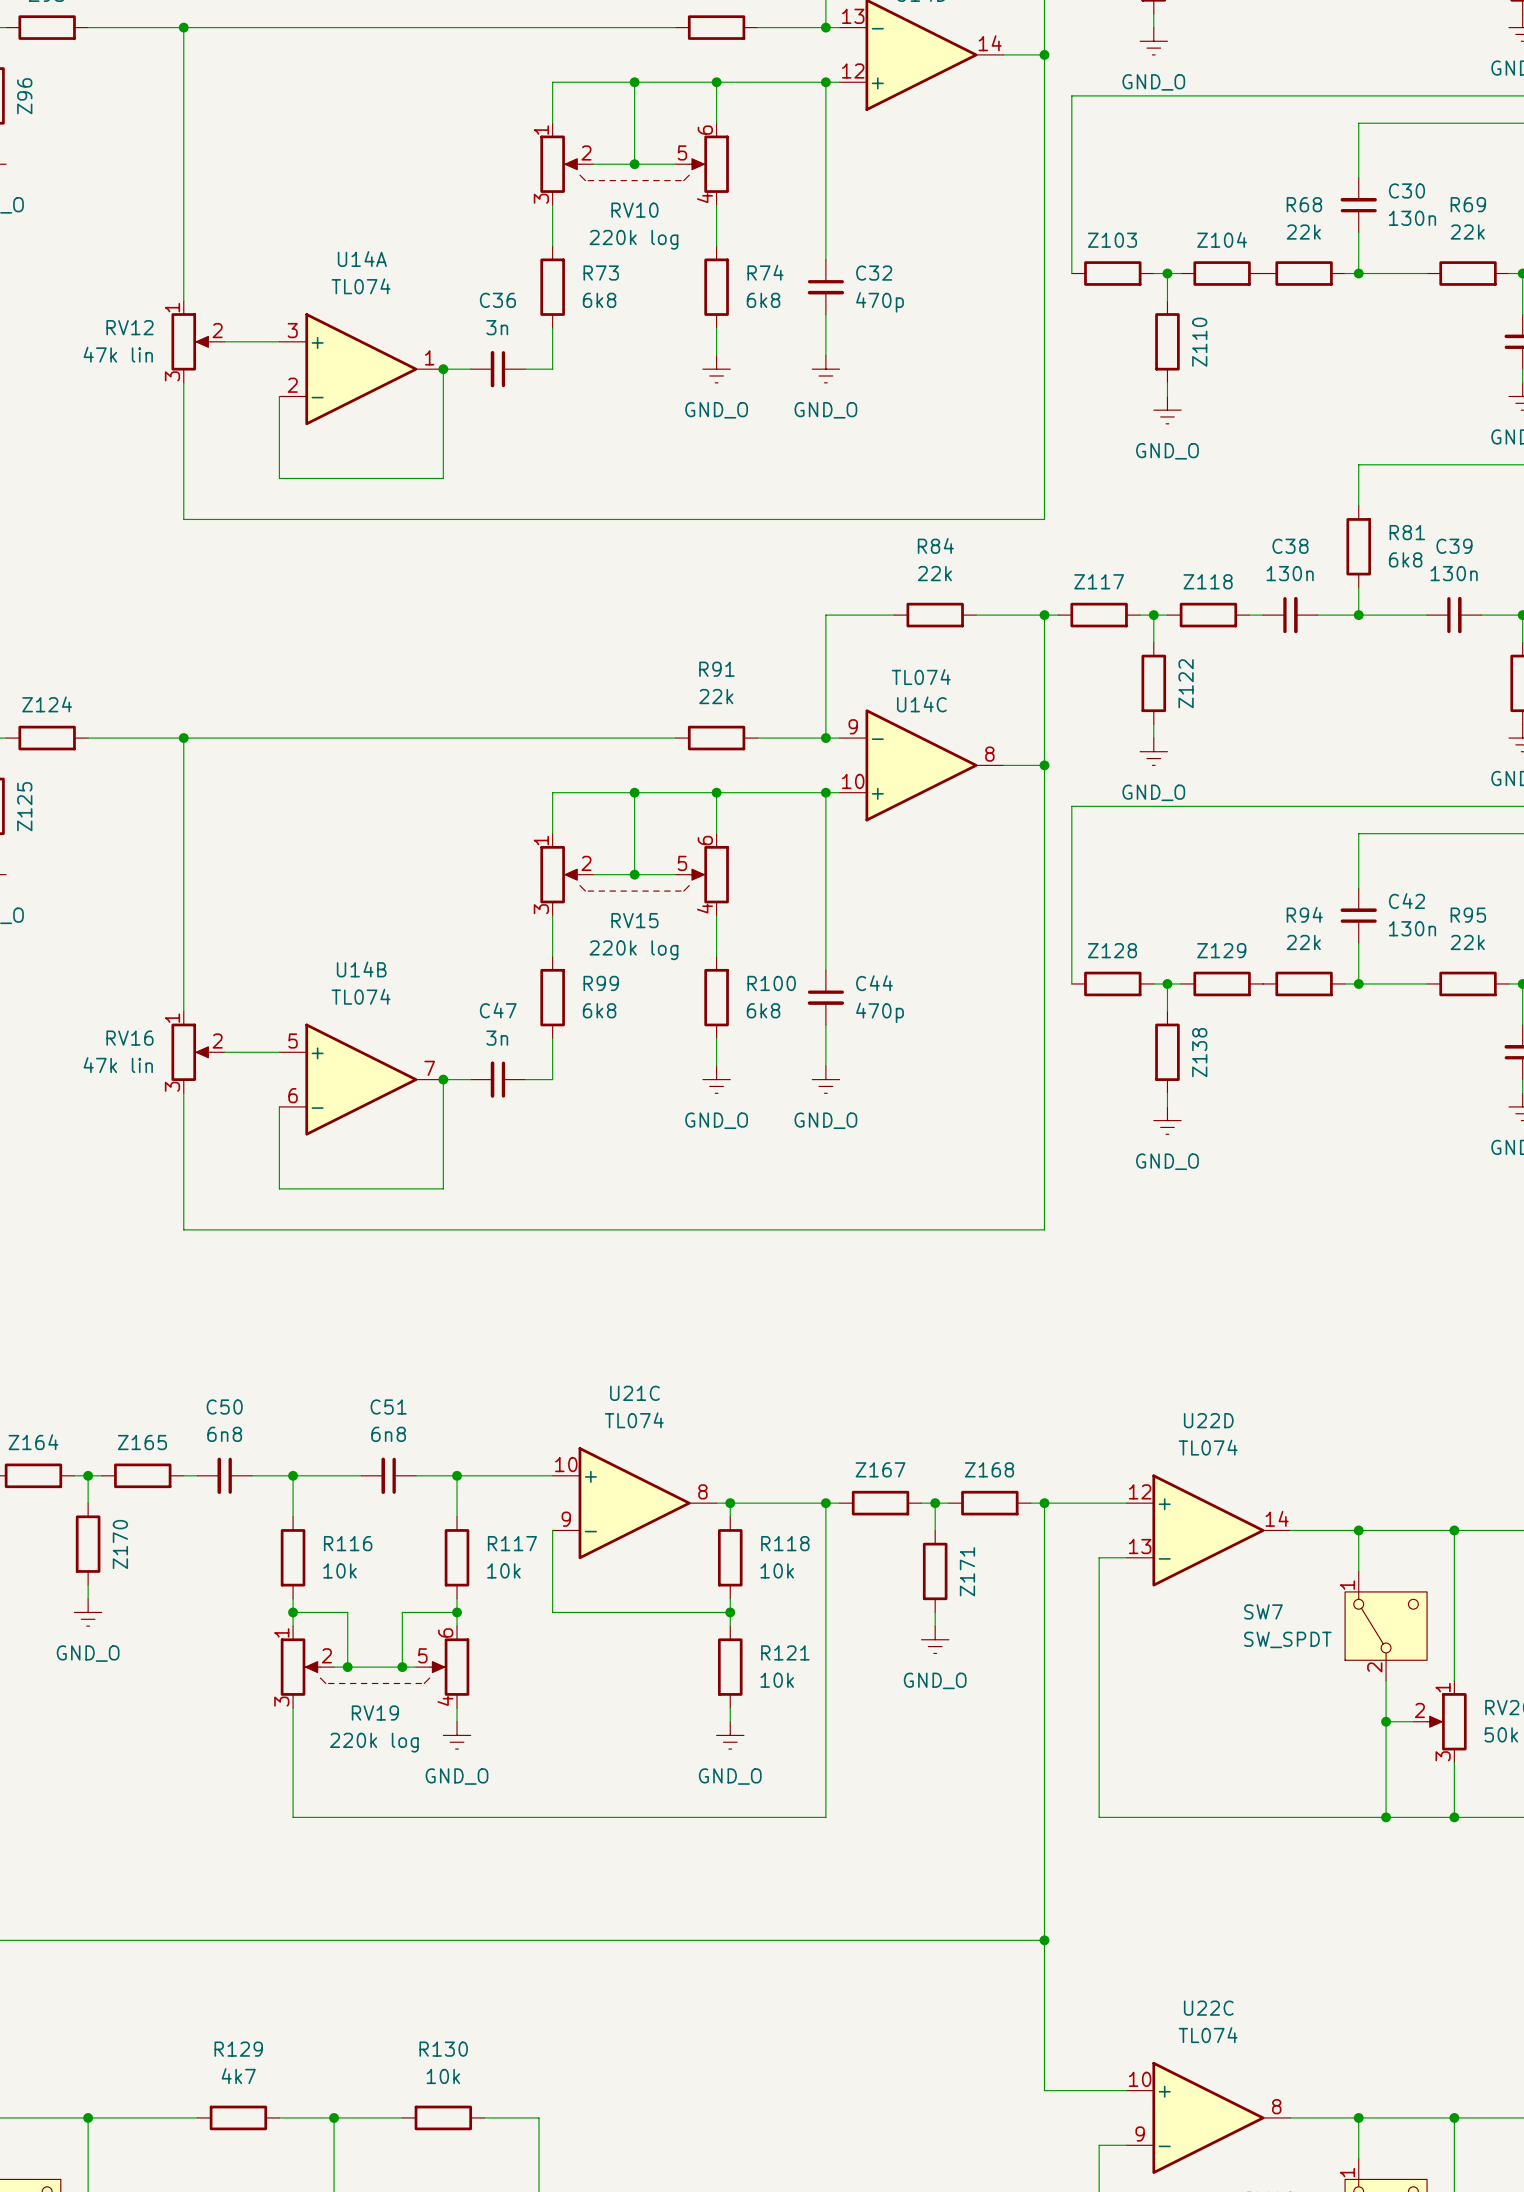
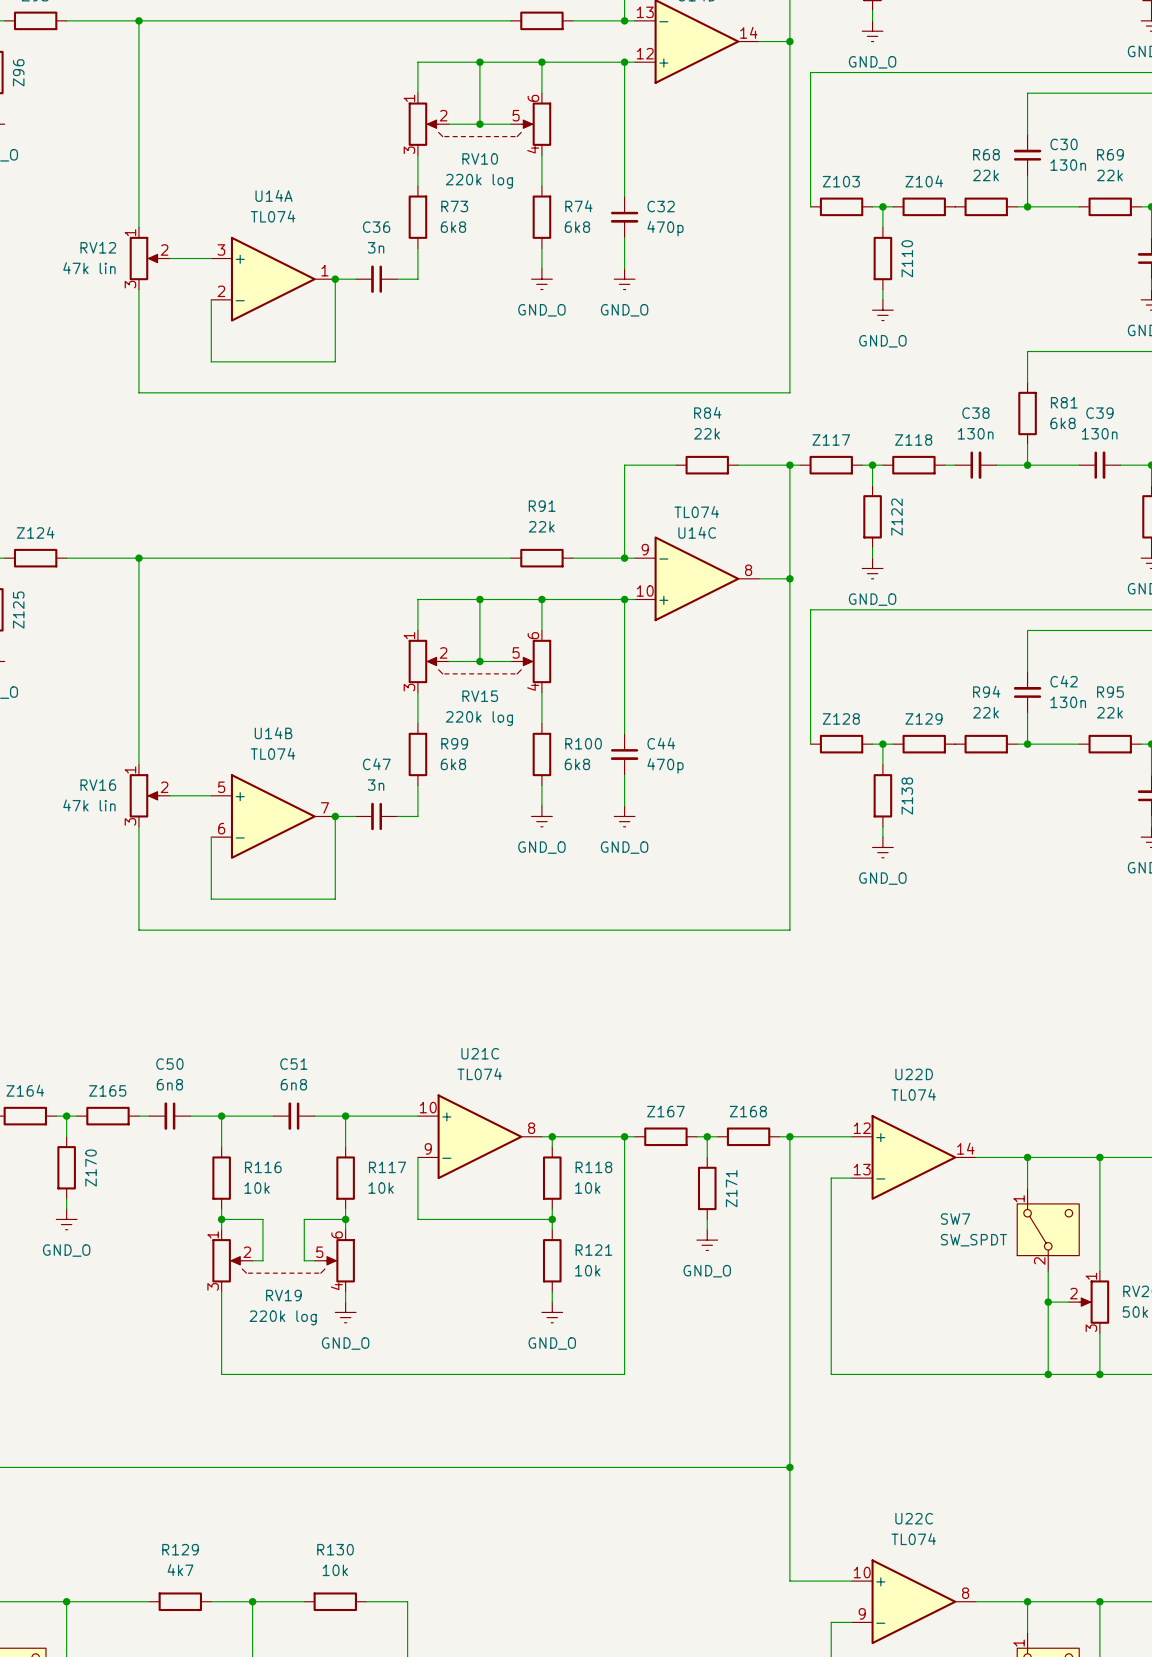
wire: (347, 1667) (402, 1667) -> none
junction: (347, 1667) -> none
junction: (402, 1667) -> none

